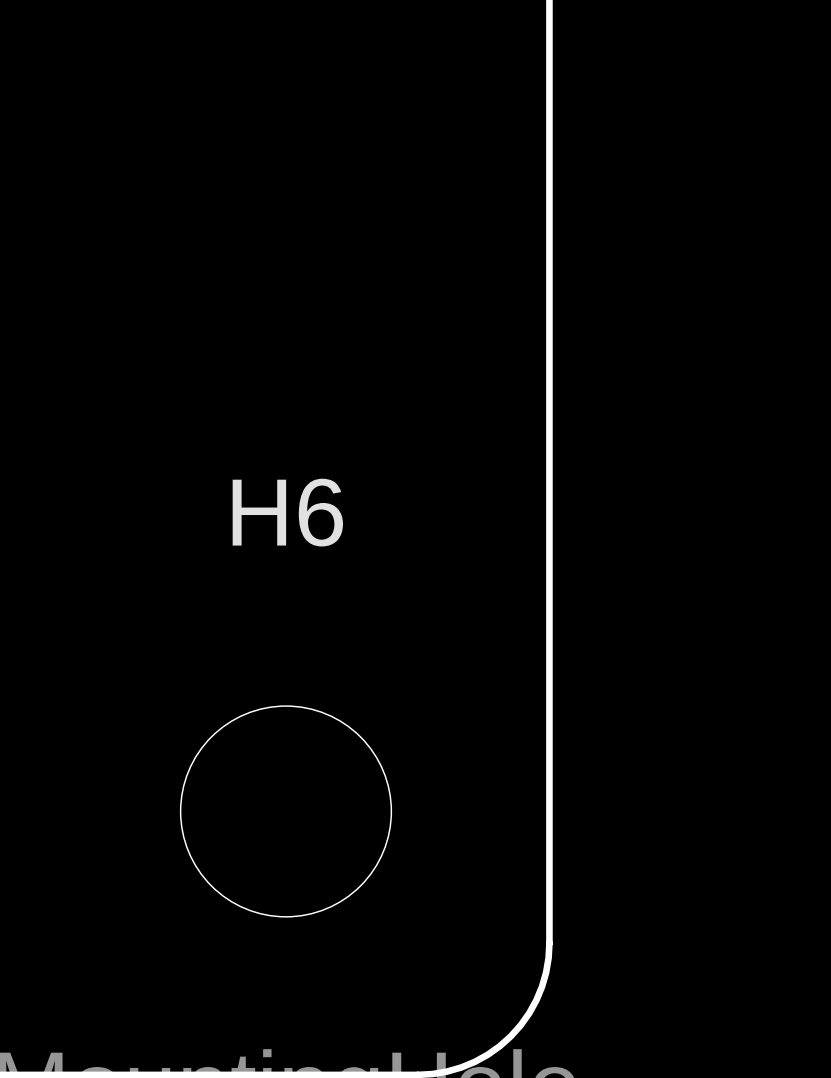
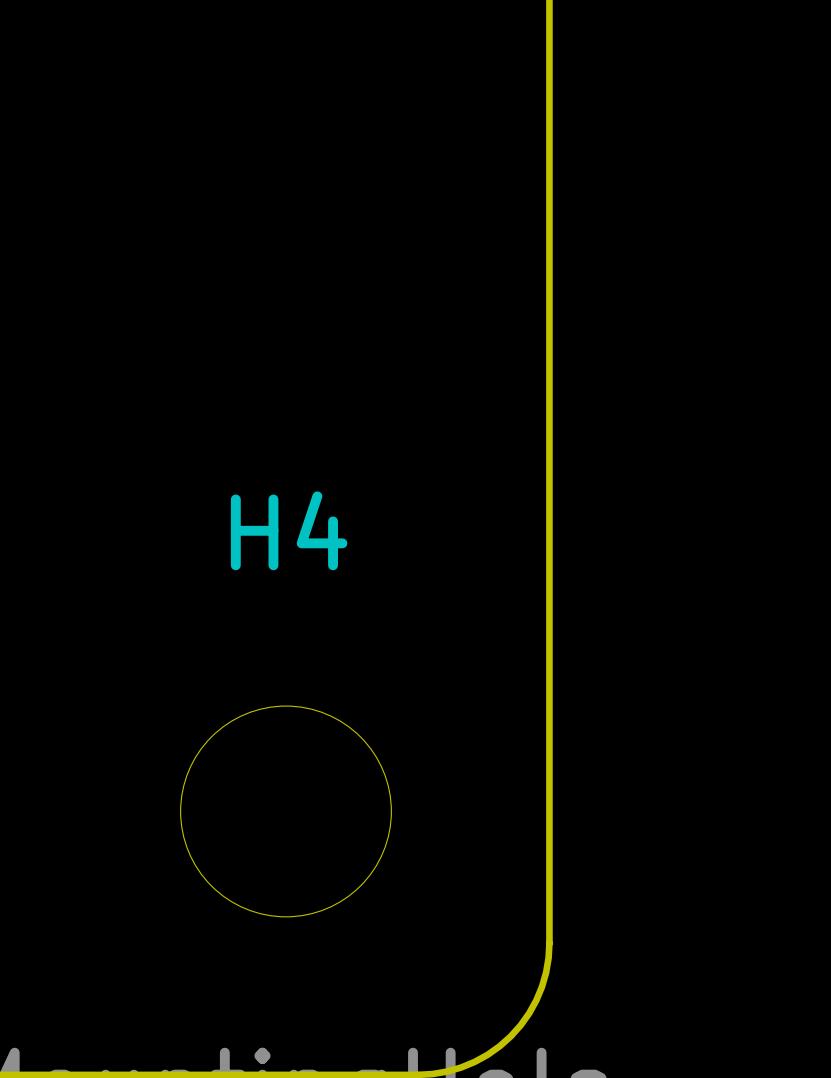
H6 name: H6 (287, 512) -> H4 (289, 530)

